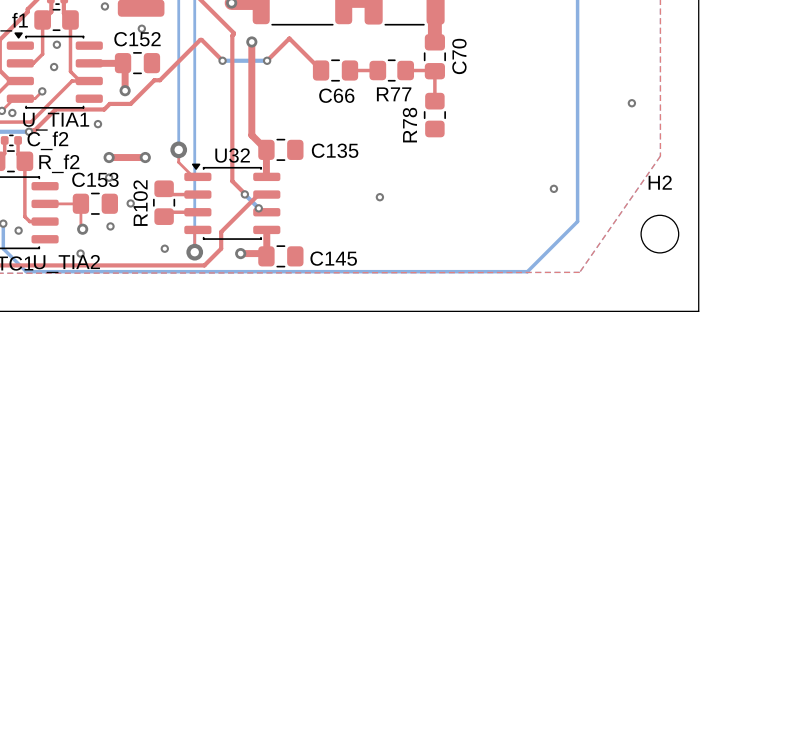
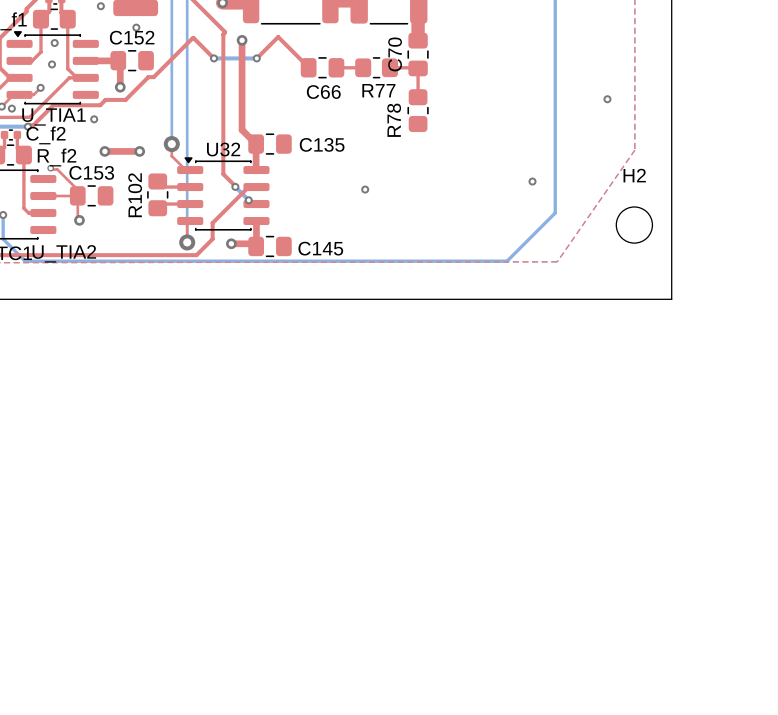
C70 name position: C70 (459, 56) -> C70 (395, 54)
top track: none -> (50, 168) (57, 169) (77, 189) (77, 195)
via: none -> (50, 168)
via: (109, 177) -> none
via: (130, 203) -> none
via: (110, 226) -> none
via: (18, 230) -> none
via: (164, 248) -> none
via: (80, 253) -> none

